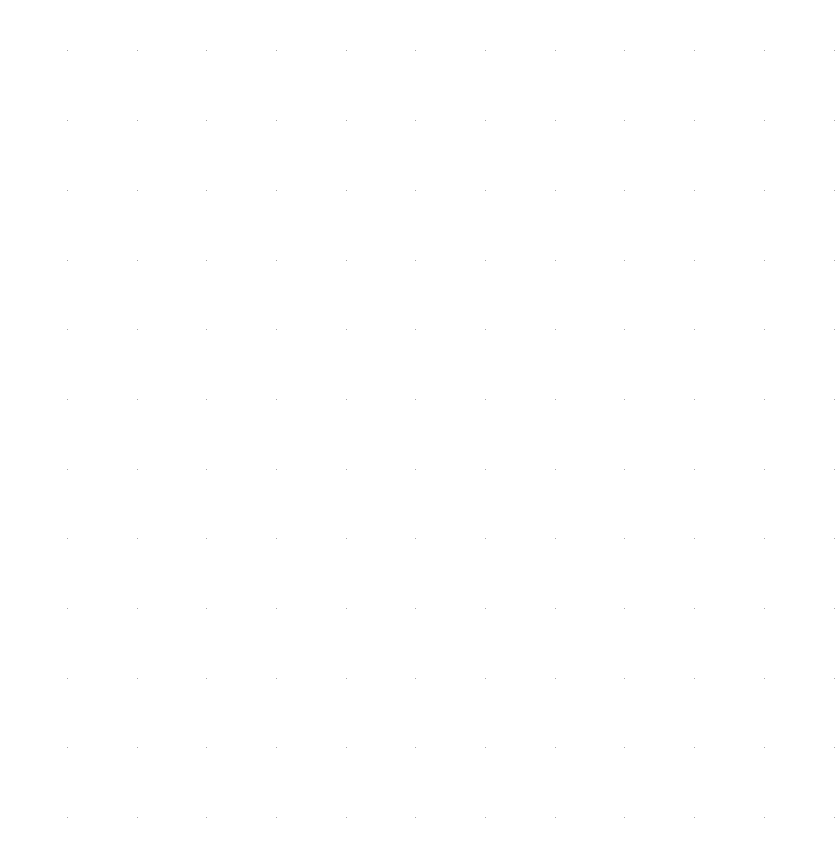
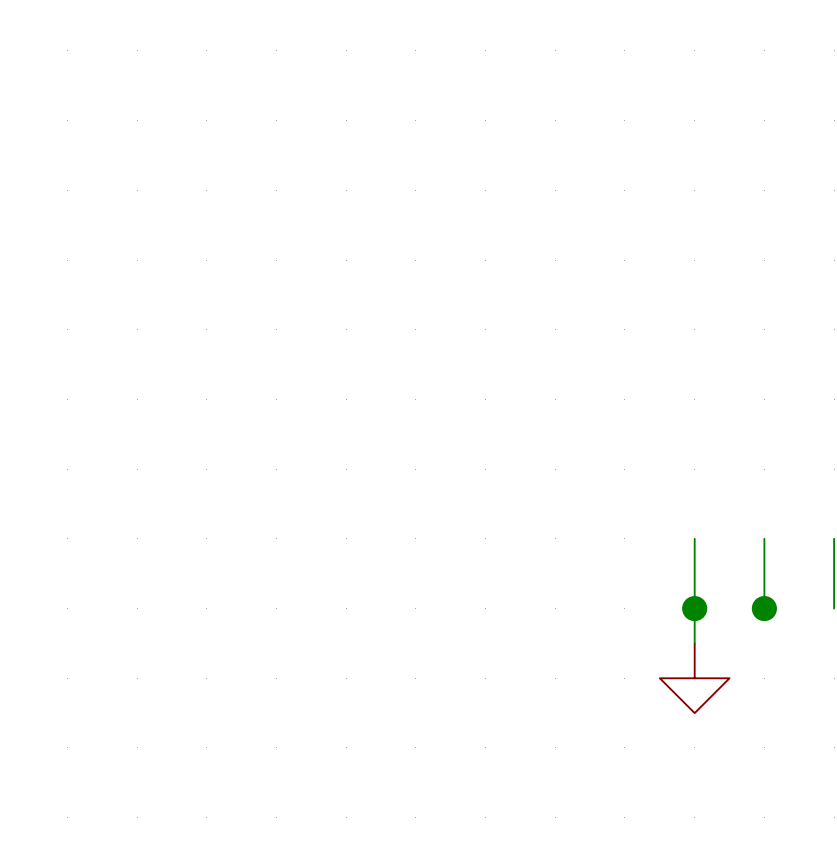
wire: none -> (694, 538) (694, 643)
wire: none -> (764, 538) (764, 608)
wire: none -> (834, 538) (834, 608)
junction: none -> (694, 608)
junction: none -> (764, 608)
power symbol: none -> (694, 678)

